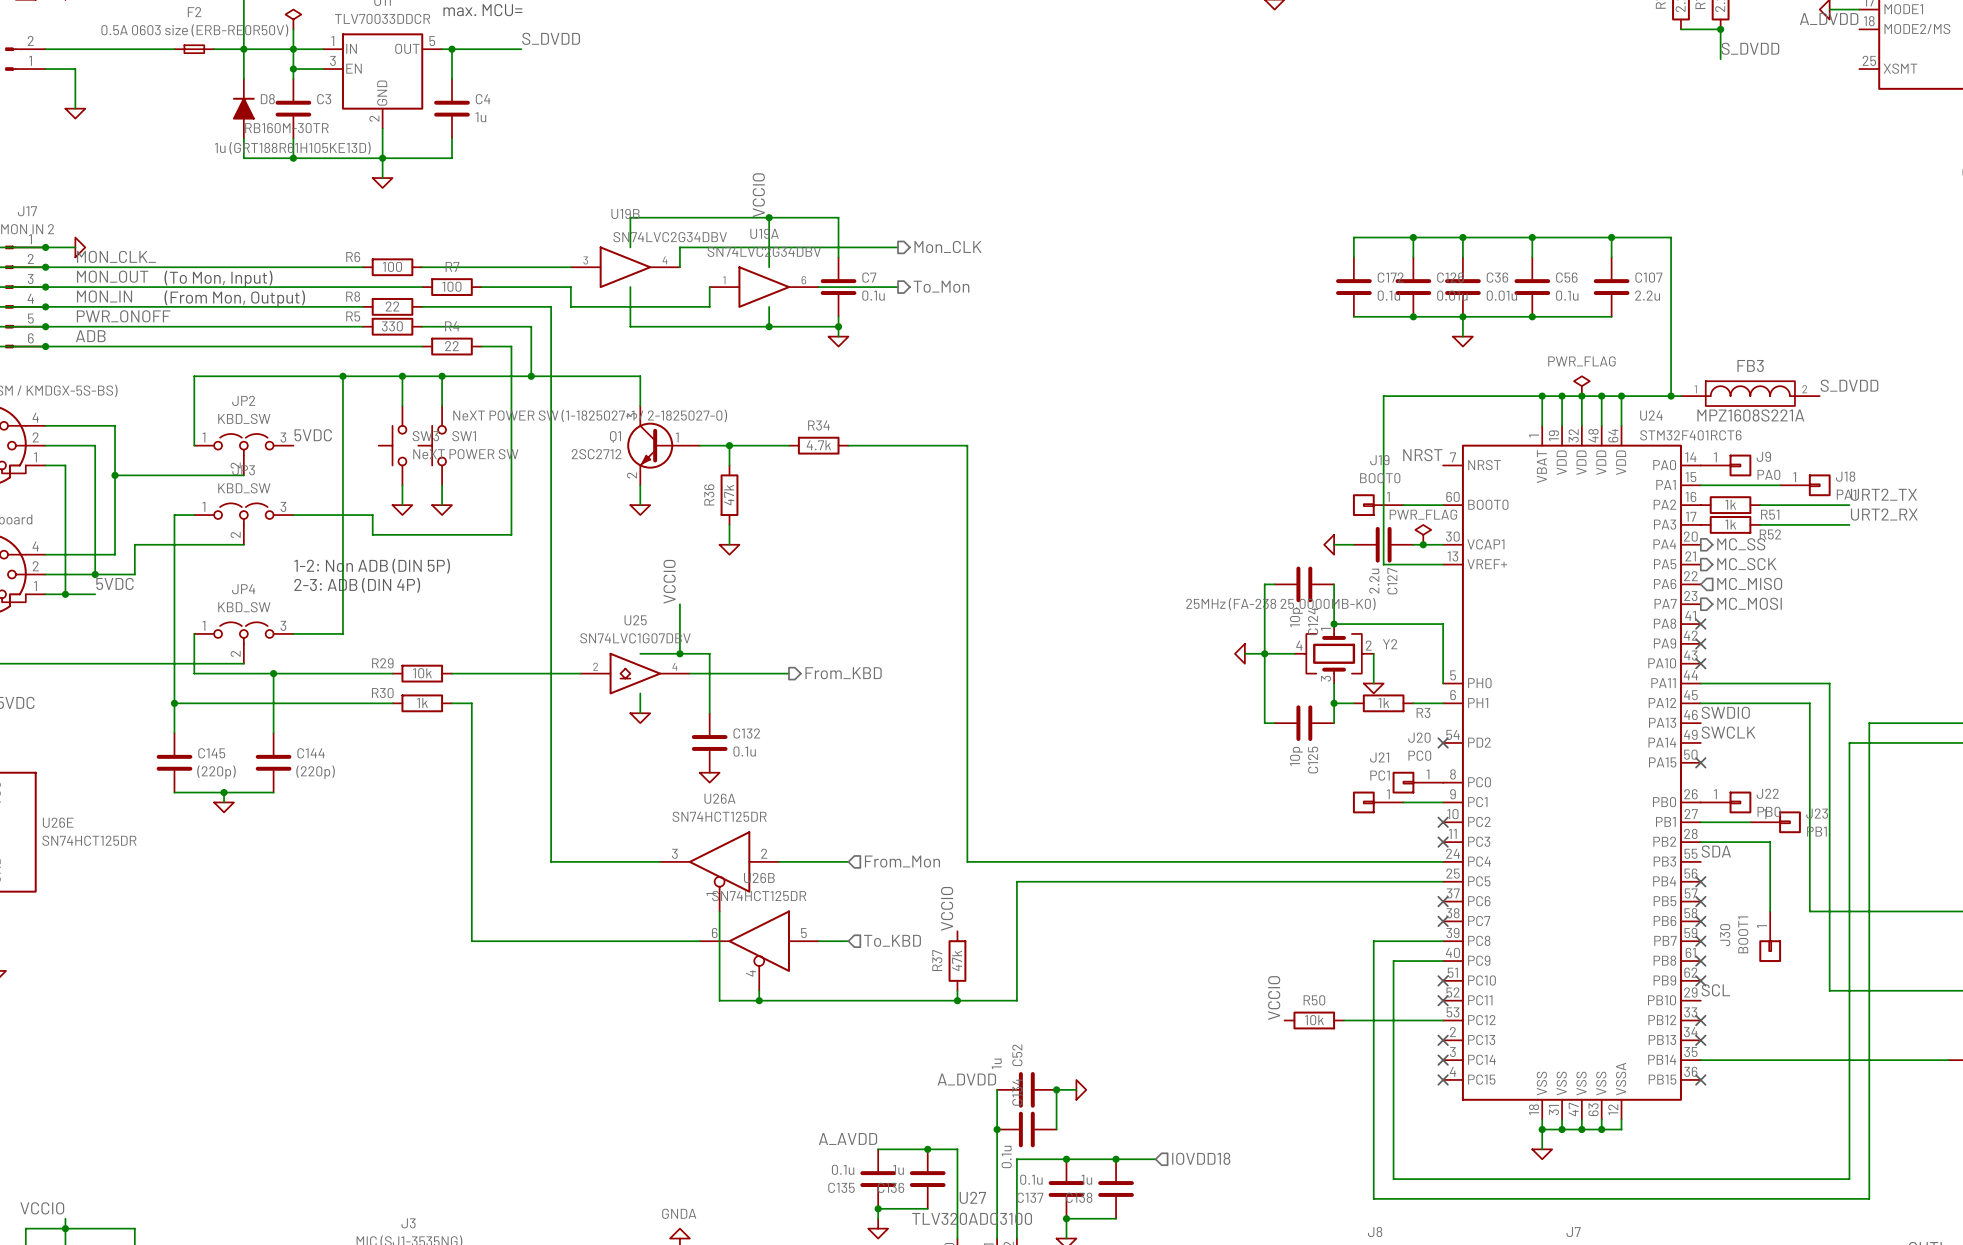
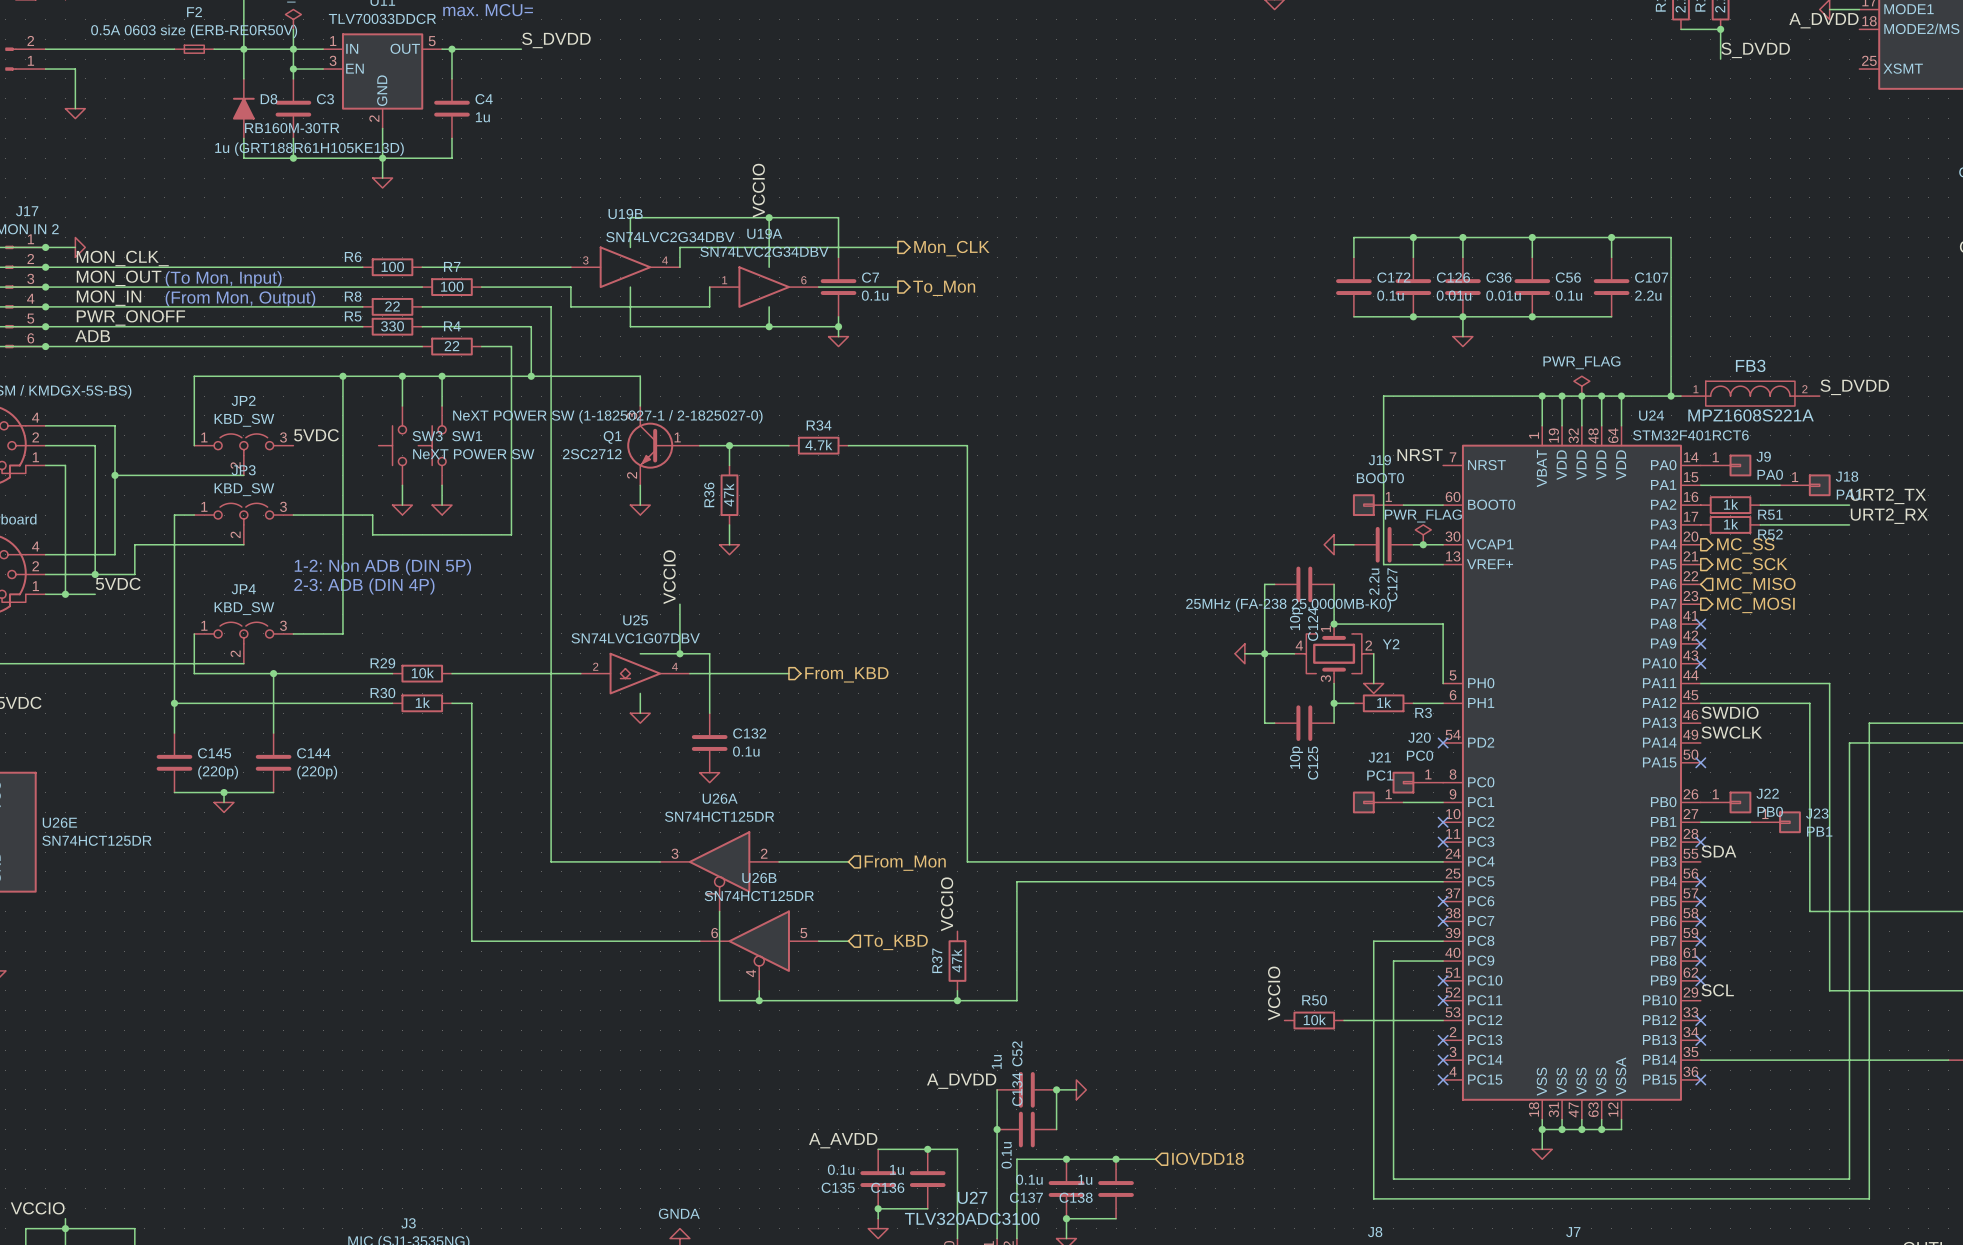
wire: (1700, 842) (1770, 842) (1770, 911) -> none
no-connect mark: none -> (1700, 842)
J30: BOOT1 (1770, 936) -> none

